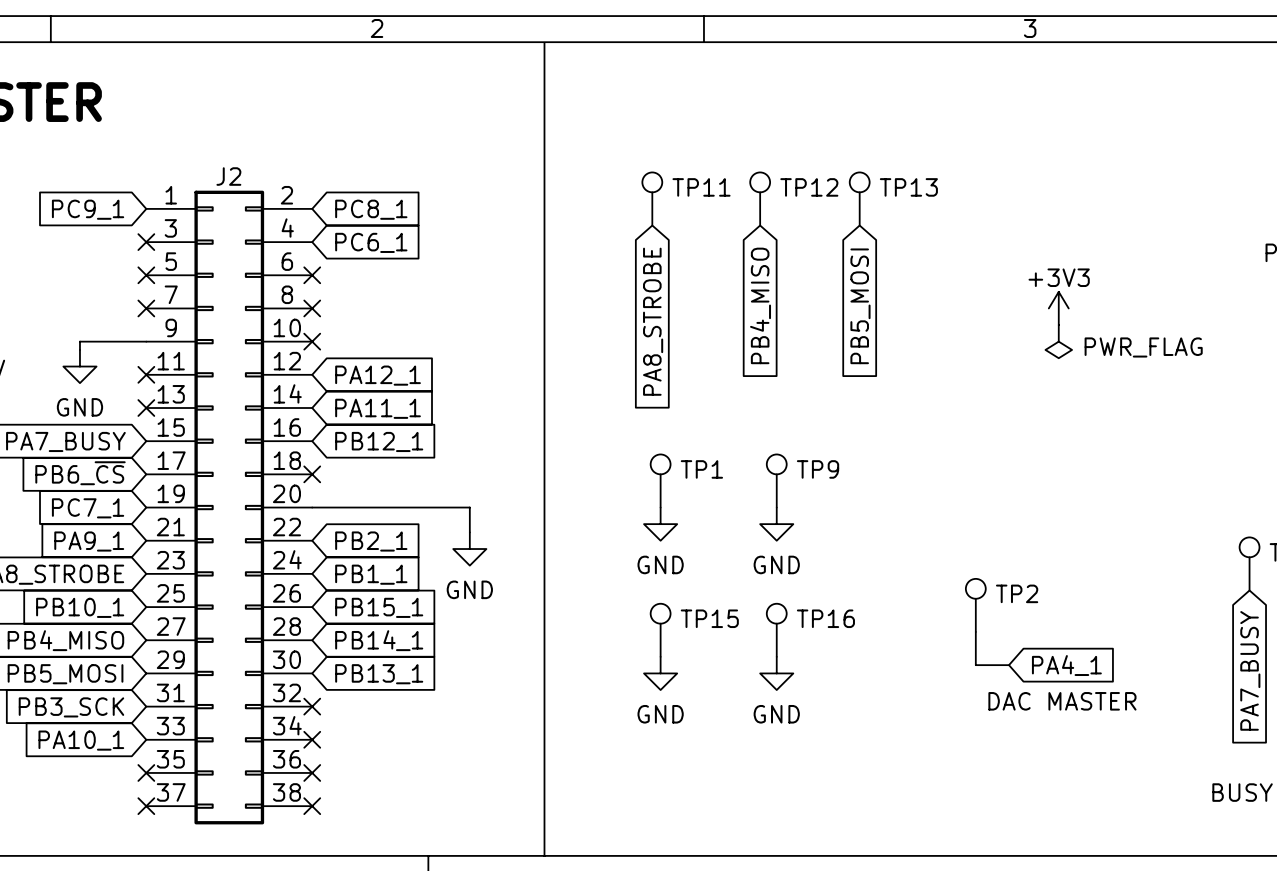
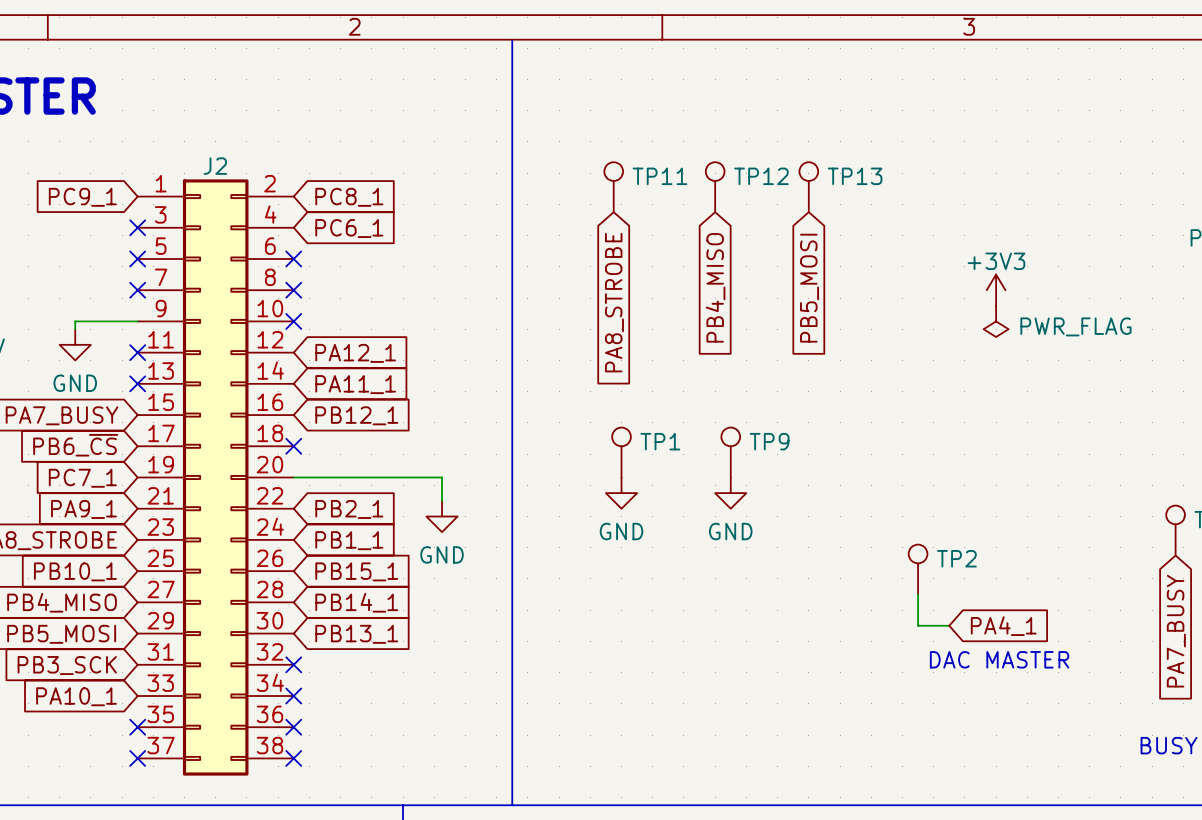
TP15: (660, 630) -> none
TP16: (776, 630) -> none
power symbol: GND (660, 673) -> none
power symbol: GND (776, 673) -> none

